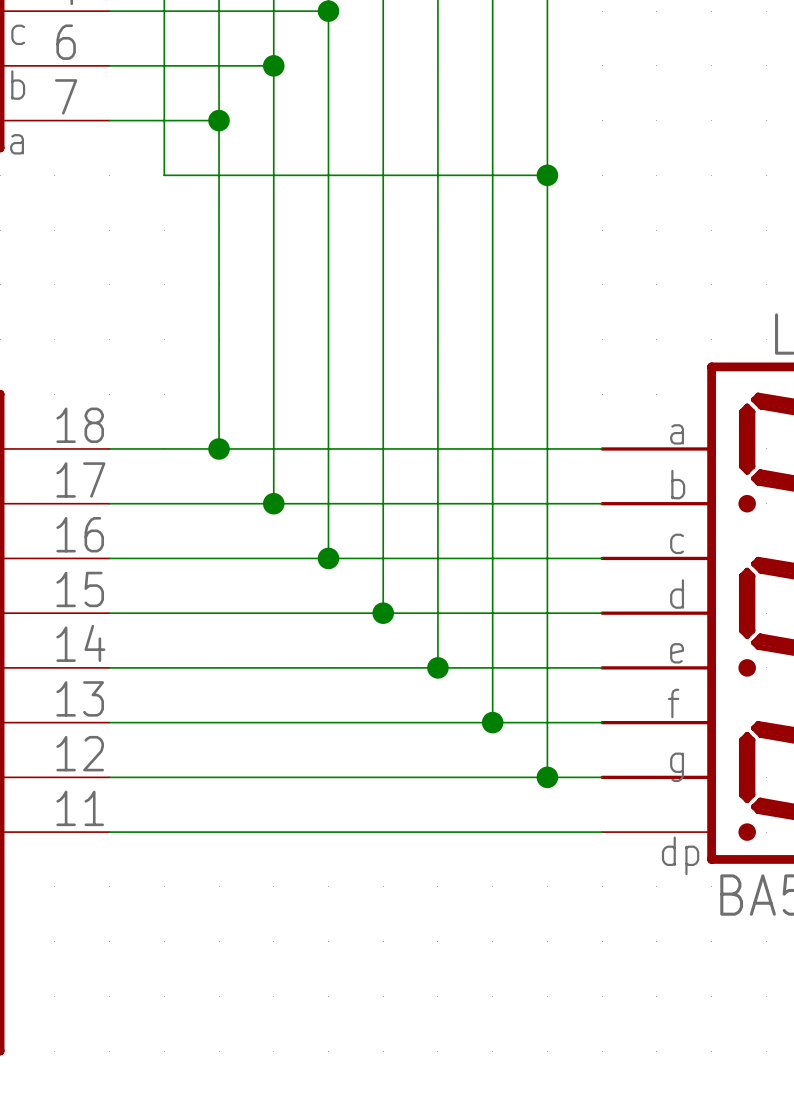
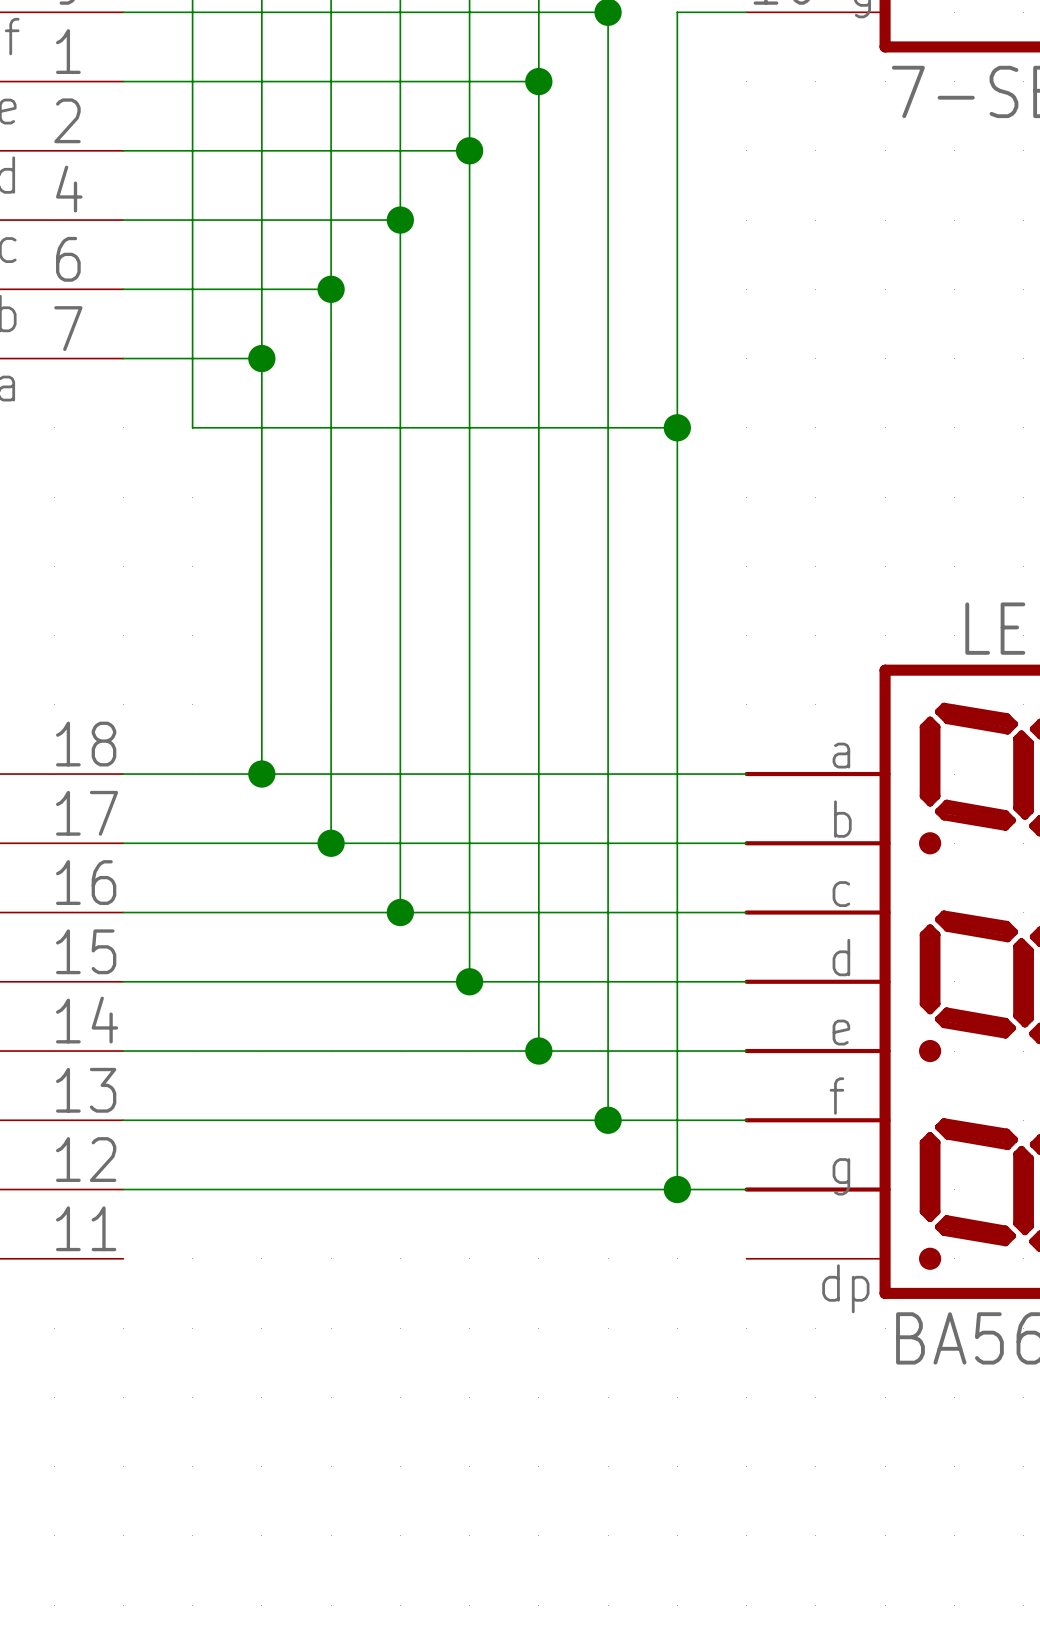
wire: (109, 832) (602, 832) -> none

